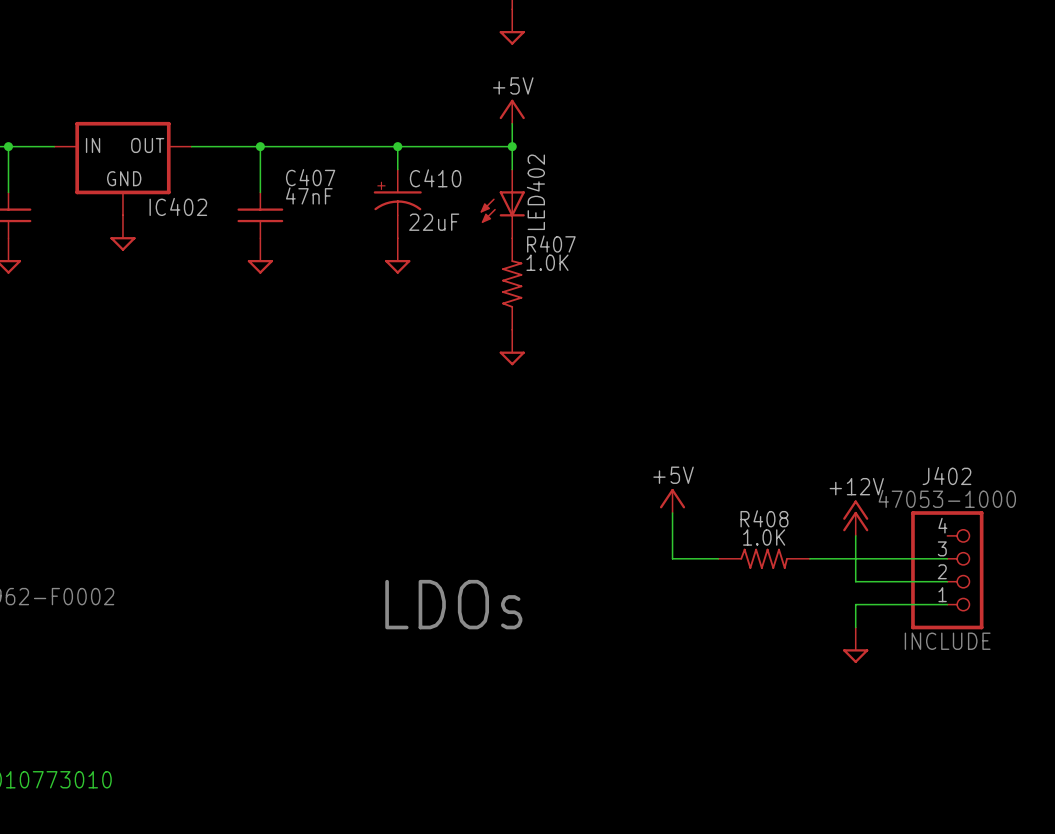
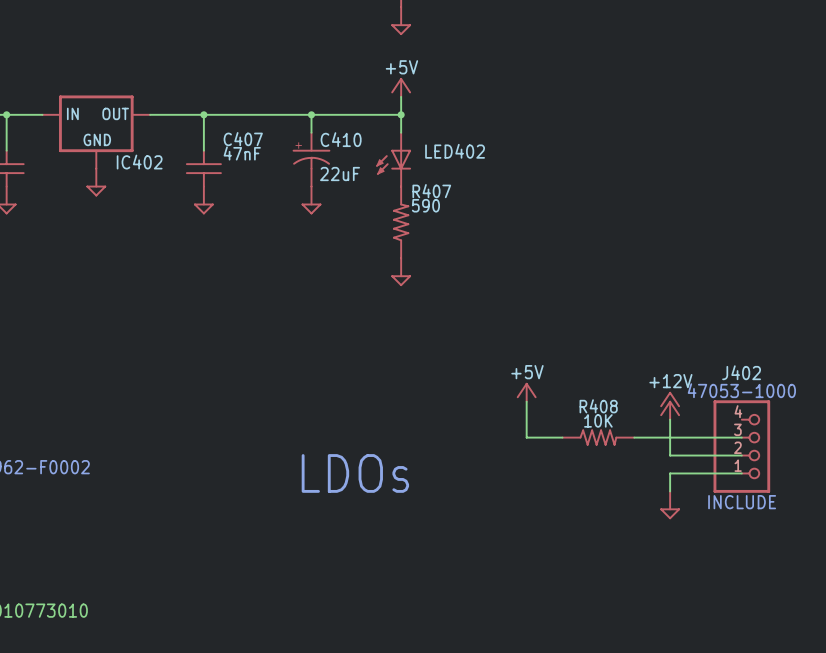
LED402 name rotation: 0° (535, 192) -> 90° clockwise (455, 151)
R407 value: 1.0K (547, 262) -> 590 (425, 205)
R408 value: 1.0K (764, 537) -> 10K (598, 420)

